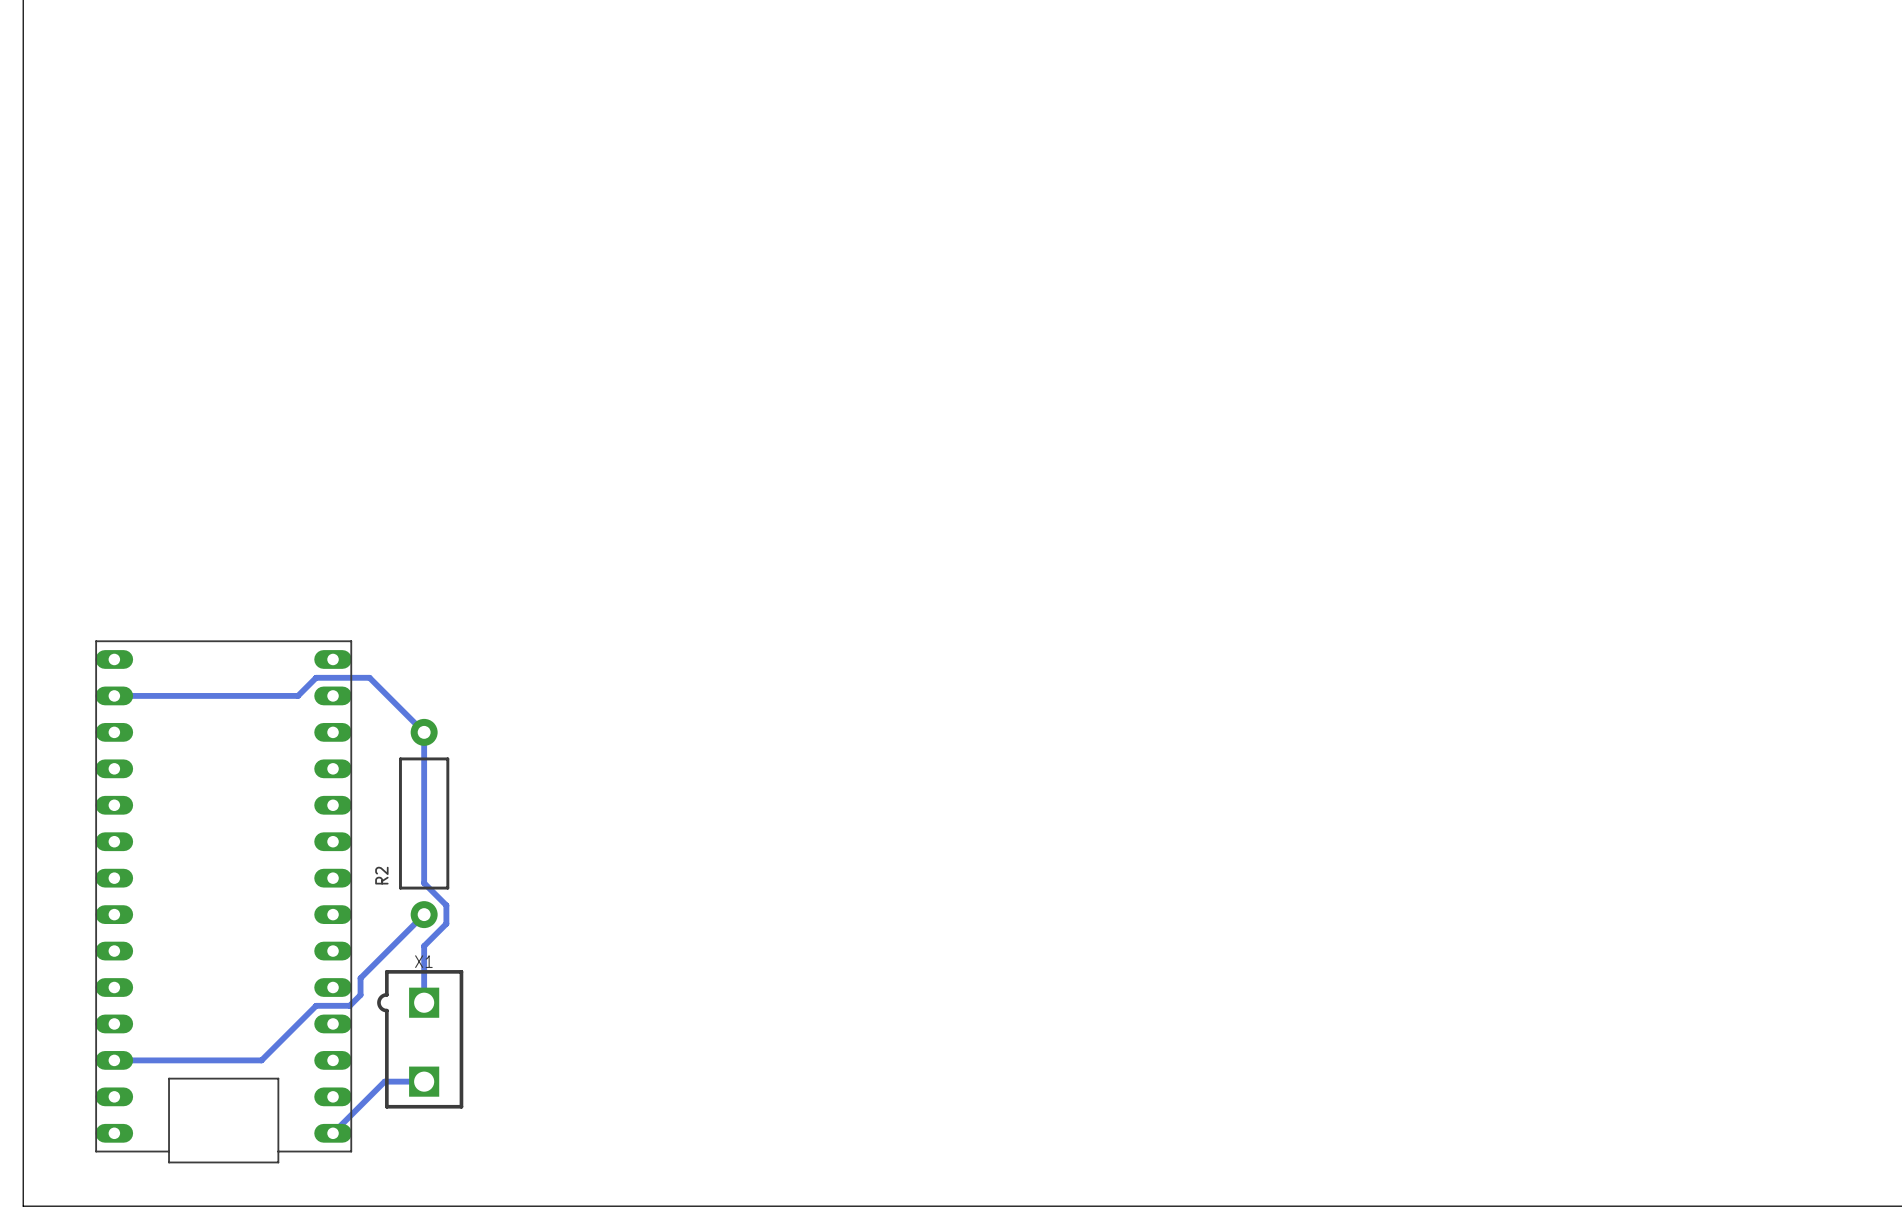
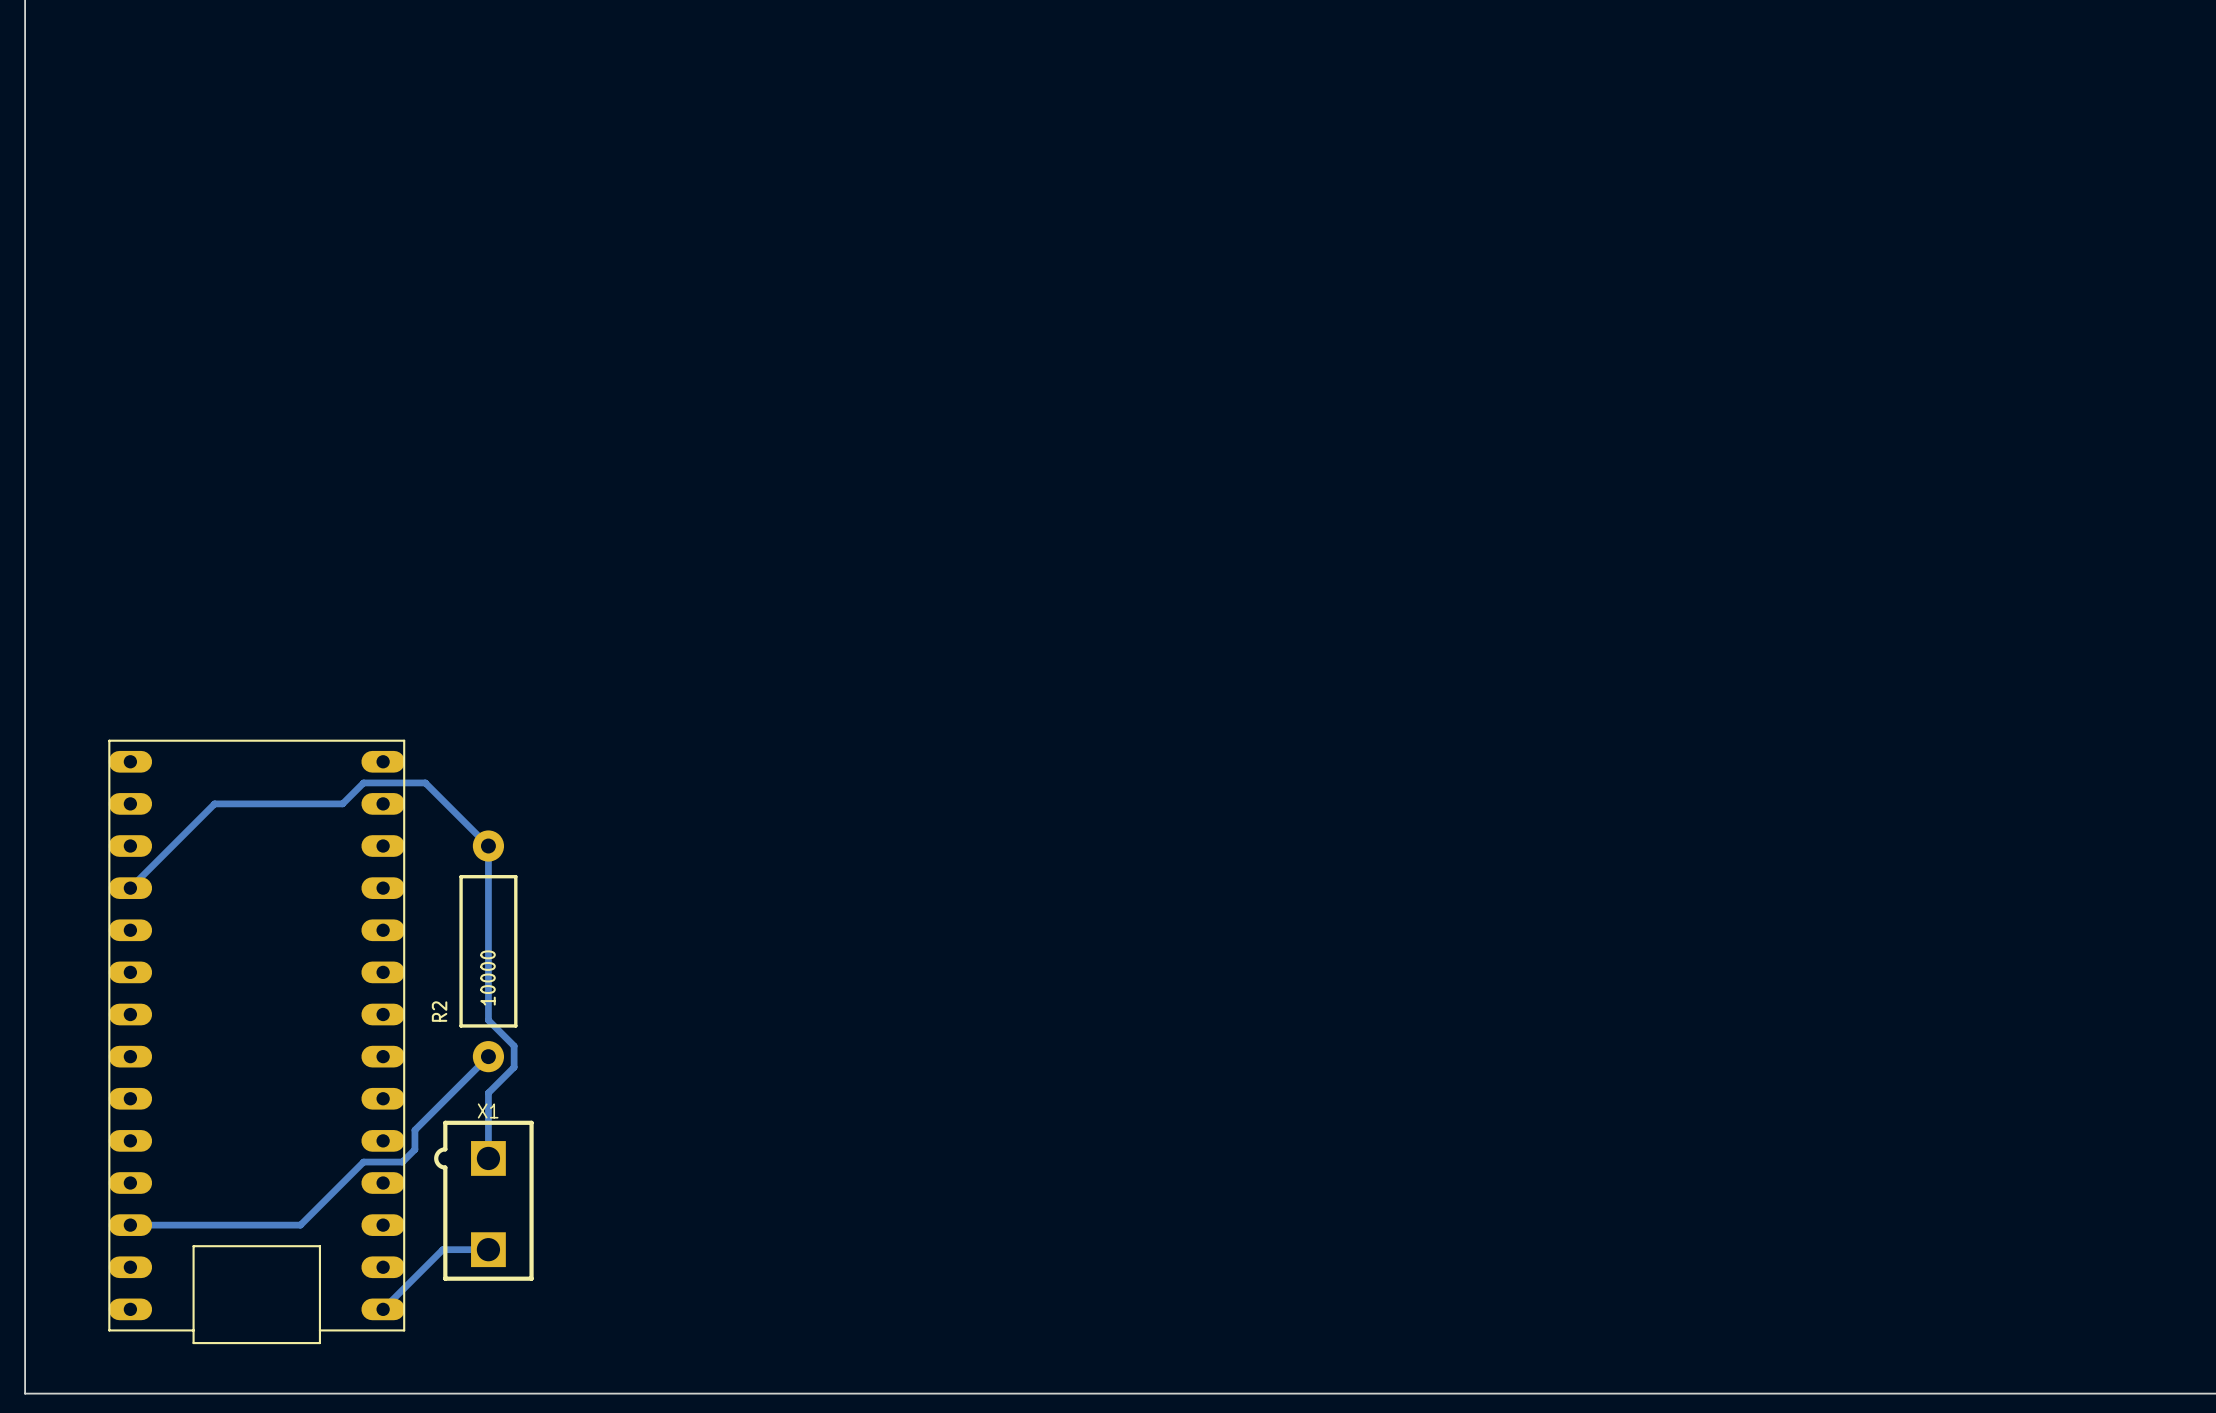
bottom track: (114, 695) (187, 695) -> (130, 888) (214, 803)
R2 value: none -> 10000 (488, 977)

